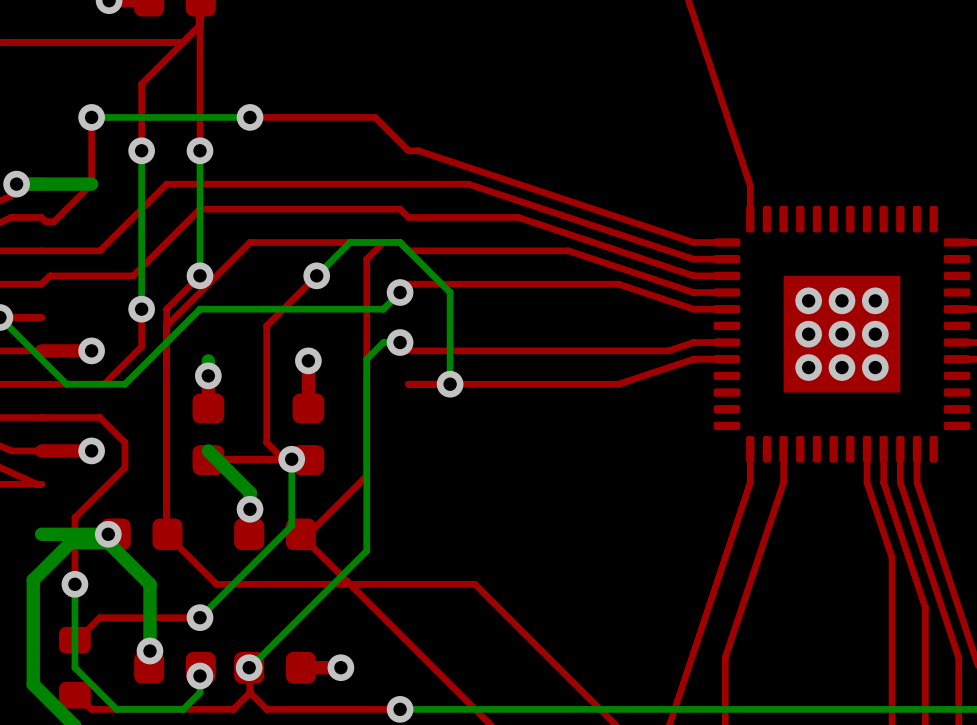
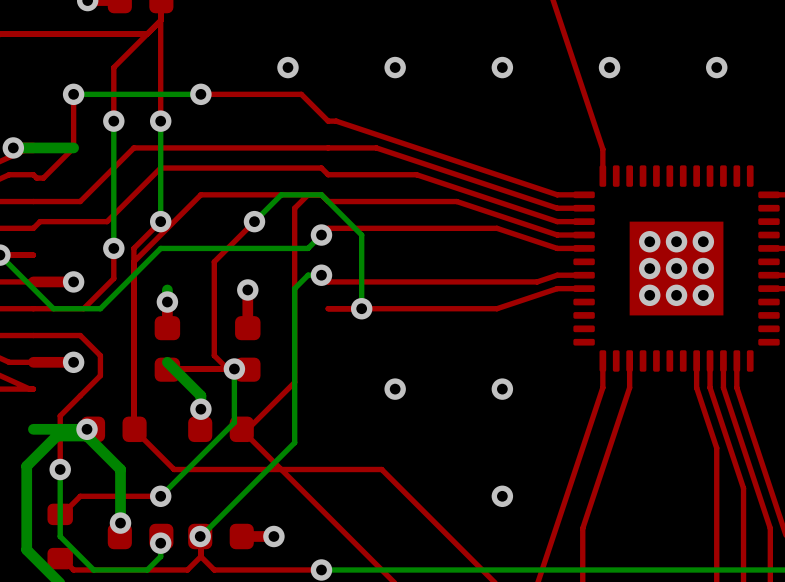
via: none -> (287, 67)
via: none -> (395, 67)
via: none -> (502, 67)
via: none -> (609, 67)
via: none -> (716, 67)
via: none -> (395, 389)
via: none -> (502, 389)
via: none -> (502, 496)

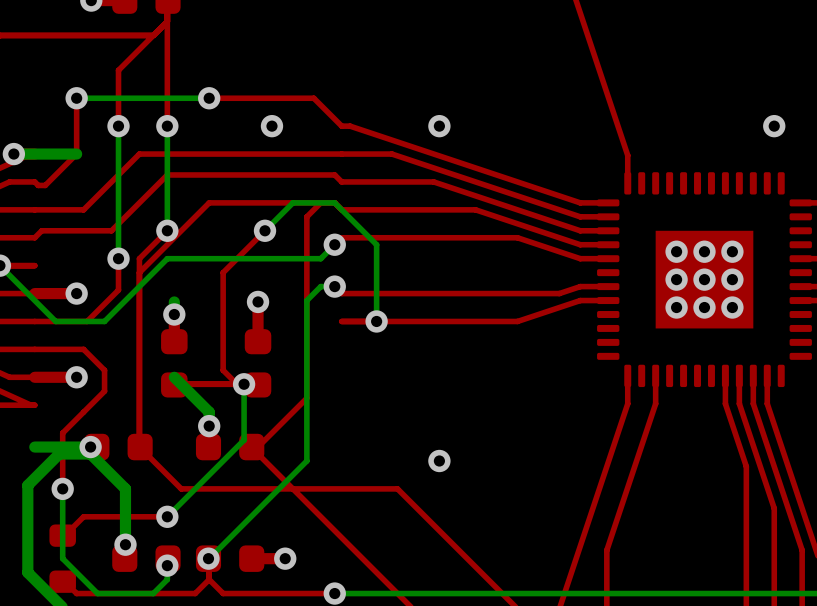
via position: (287, 67) -> (271, 126)
via: (395, 67) -> none
via: (502, 67) -> none
via: (609, 67) -> none
via position: (716, 67) -> (774, 126)
via: none -> (439, 126)
via: (395, 389) -> none
via: (502, 389) -> none
via: none -> (439, 461)
via: (502, 496) -> none

